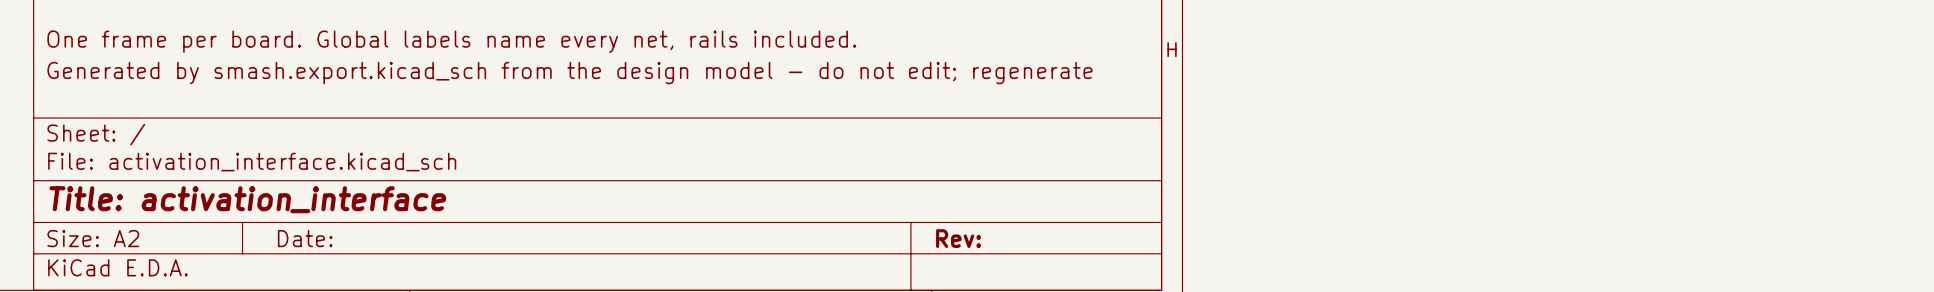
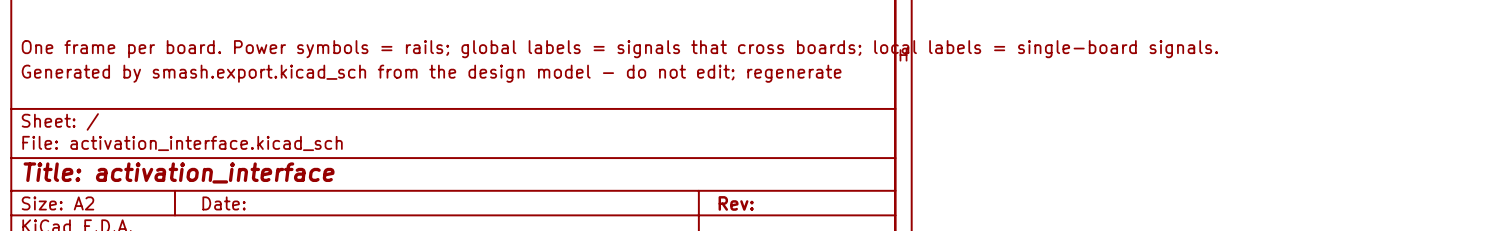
title block: One frame per board. Global labels name every net, rails included. (451, 41) -> One frame per board. Power symbols = rails; global labels = signals that cross boards; local labels = single-board signals. (619, 49)

